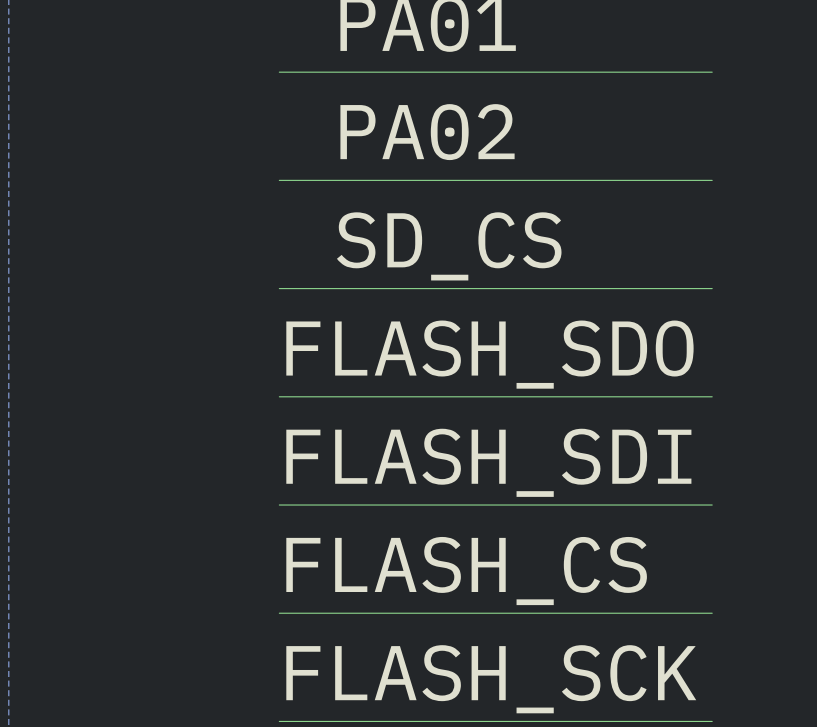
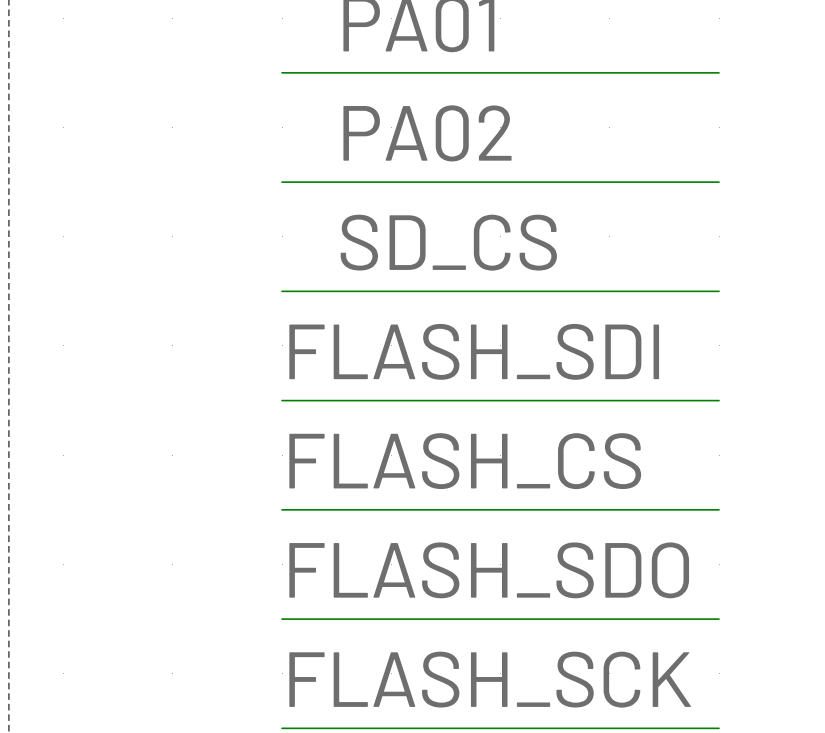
label: FLASH_SDO (489, 354) -> FLASH_SDI (474, 351)
label: FLASH_SDI (488, 462) -> FLASH_CS (465, 461)
label: FLASH_CS (466, 571) -> FLASH_SDO (489, 570)

